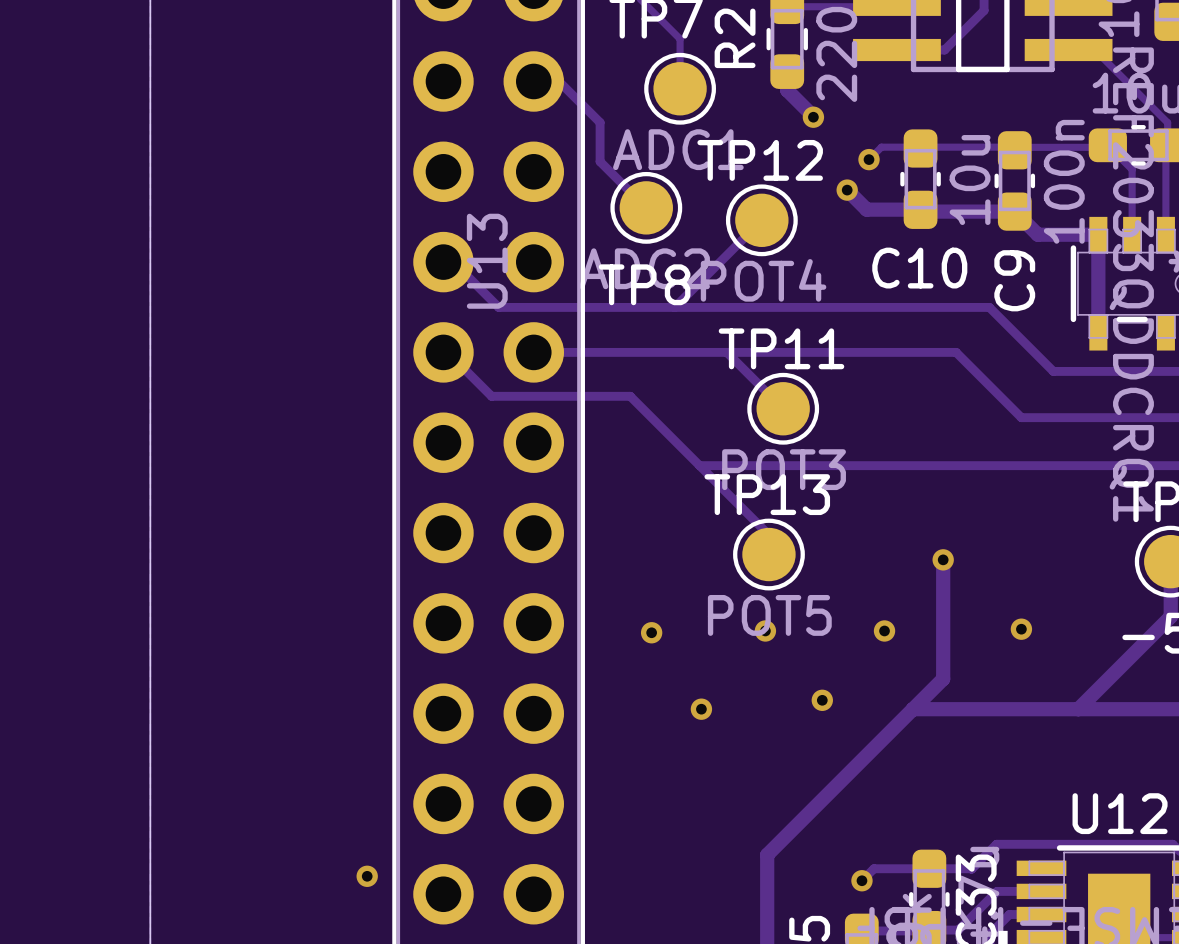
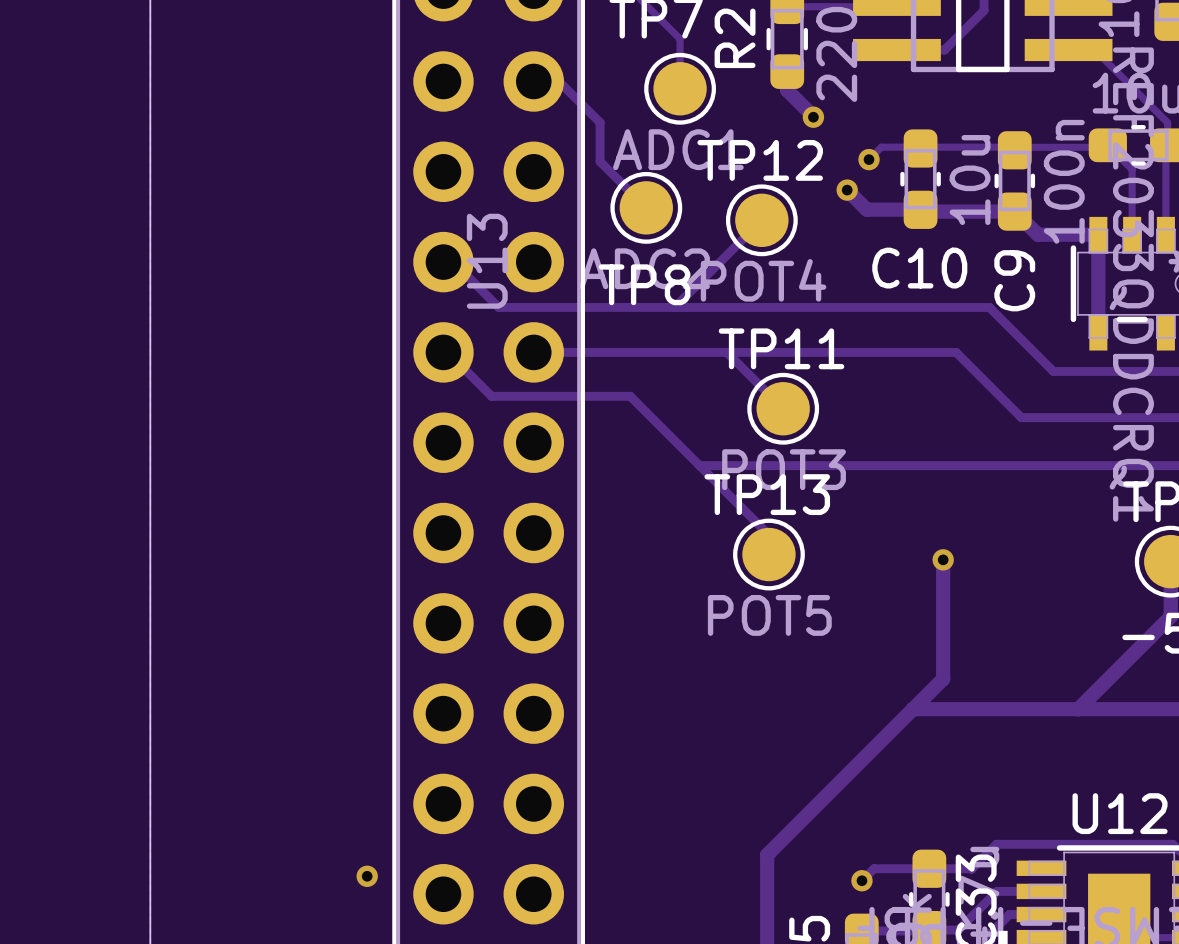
via: (1021, 629) -> none
via: (765, 630) -> none
via: (884, 630) -> none
via: (651, 632) -> none
via: (822, 700) -> none
via: (701, 709) -> none

